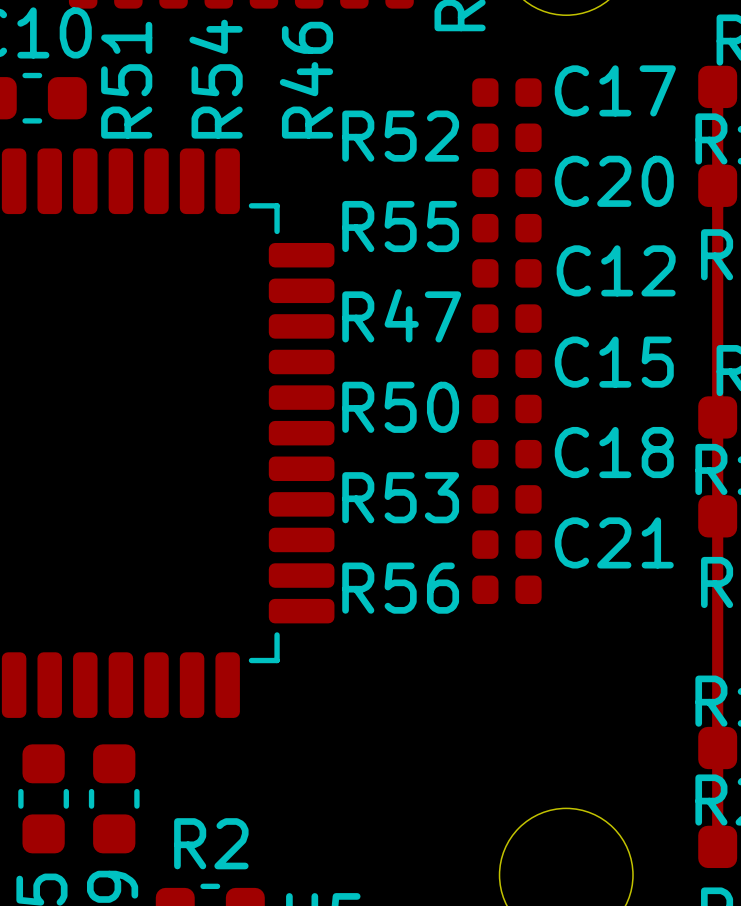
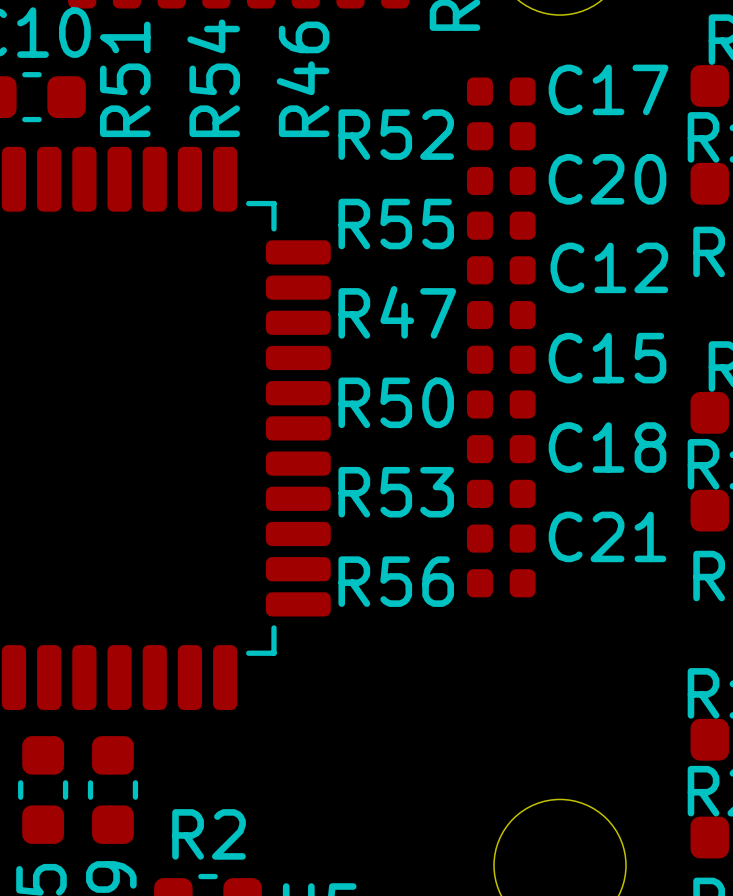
top track: (717, 86) (717, 846) -> none

